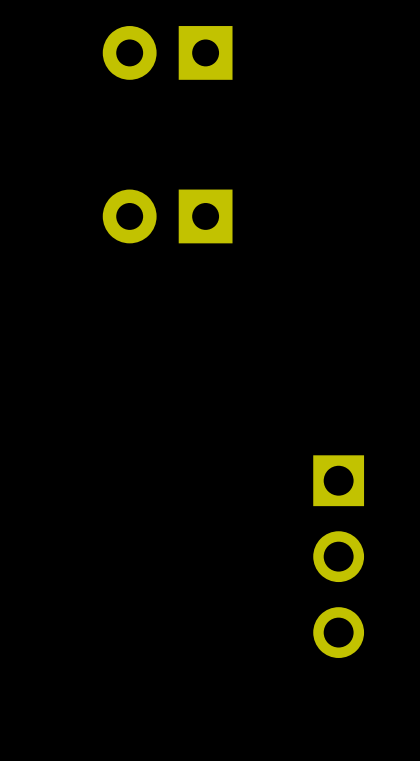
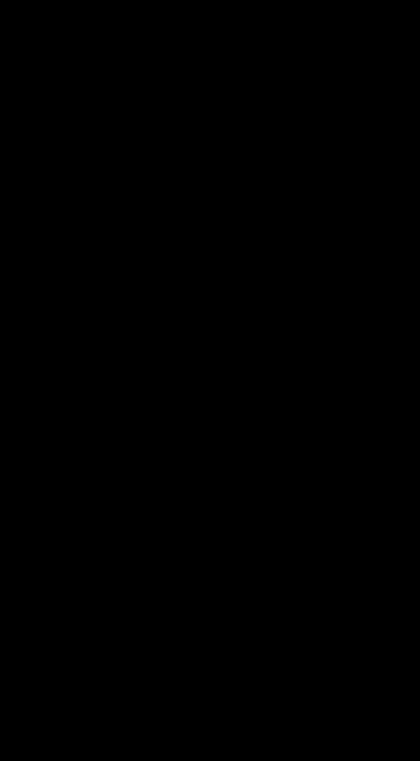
part: (167, 52) -> none
part: (167, 216) -> none
part: (338, 556) -> none

